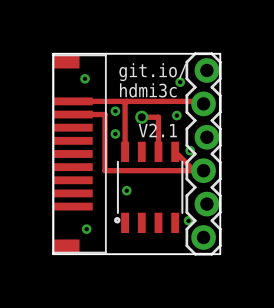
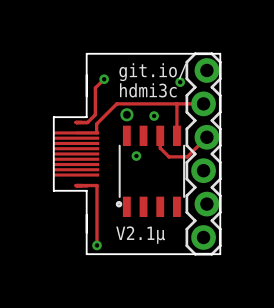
board edge: (86, 53) (53, 53) (53, 254) (86, 254) -> (86, 53) (86, 96)
part footprint: [52, 54, 107, 254] -> [53, 75, 100, 233]
via: (85, 78) -> none
track: none -> (104, 79) (95, 88) (95, 114) (87, 122) (76, 122) (87, 122)
via: none -> (104, 79)
track: (73, 101) (201, 101) (203, 103) -> (76, 132) (96, 132) (96, 123) (116, 103) (203, 103)
track: (126, 101) (125, 103) (125, 151) -> none
track: none -> (176, 103) (176, 135)
via: (115, 111) -> none
track: (73, 114) (105, 114) (105, 170) (203, 170) -> none
via: (176, 115) -> none
via: none -> (154, 116)
track: (141, 117) (158, 117) (158, 151) -> none
via position: (141, 117) -> (126, 114)
text: V2.1 (157, 130) -> none
via: (115, 133) -> none
track: none -> (160, 135) (160, 148) (168, 156) (187, 156) (206, 137)
via: (190, 150) -> none
track: (175, 151) (193, 170) -> none
via: none -> (136, 156)
track: none -> (87, 185) (76, 185) (96, 185) (96, 245)
part position: (148, 187) -> (150, 171)
via: (126, 190) -> none
board edge: none -> (86, 214) (86, 254)
via: (188, 220) -> none
via position: (86, 229) -> (96, 245)
text: none -> V2.1µ (140, 235)

